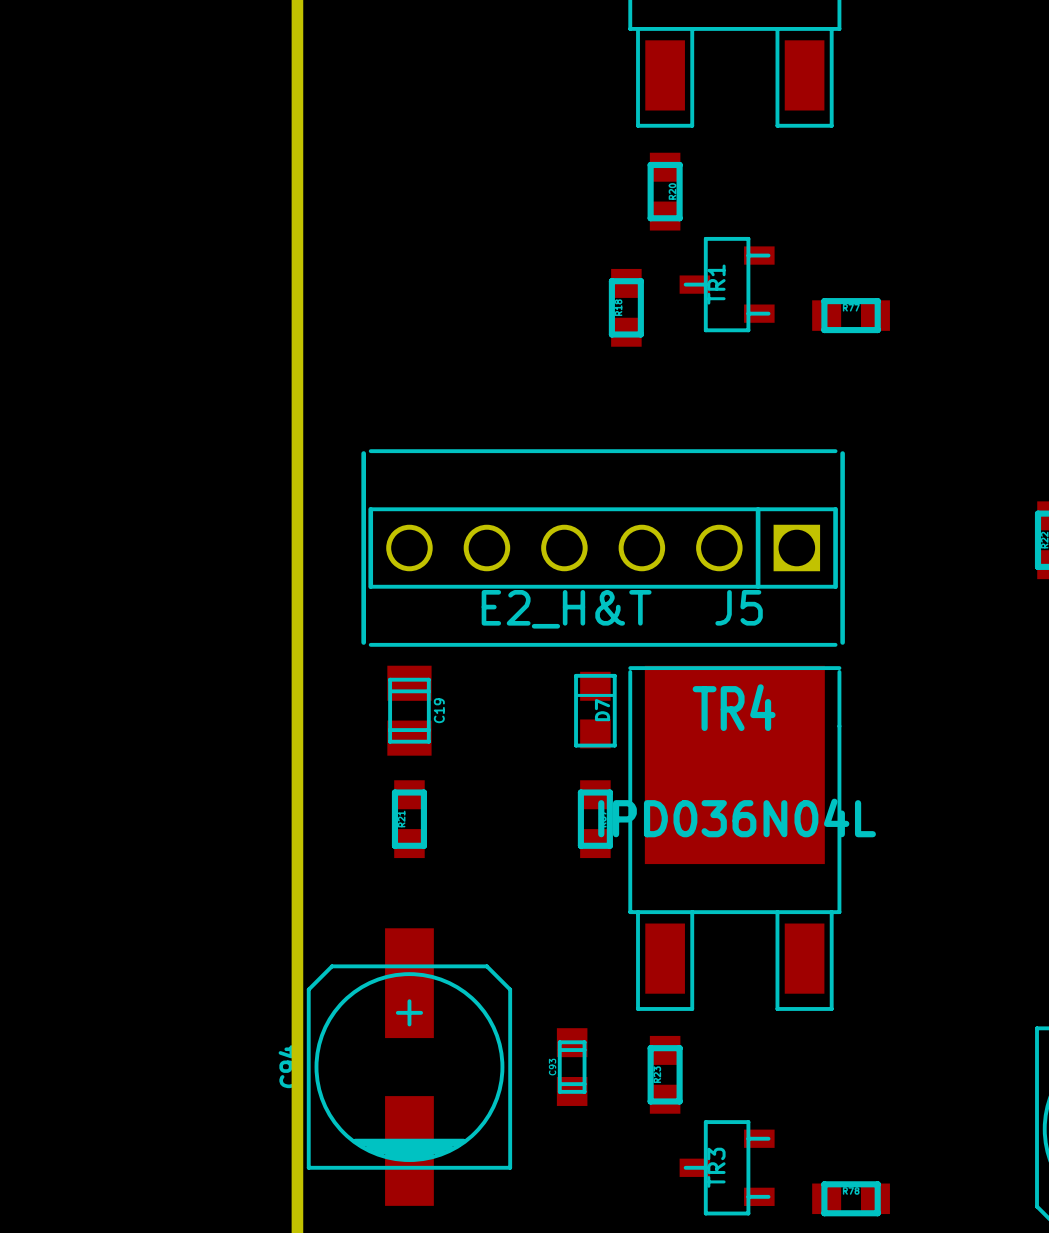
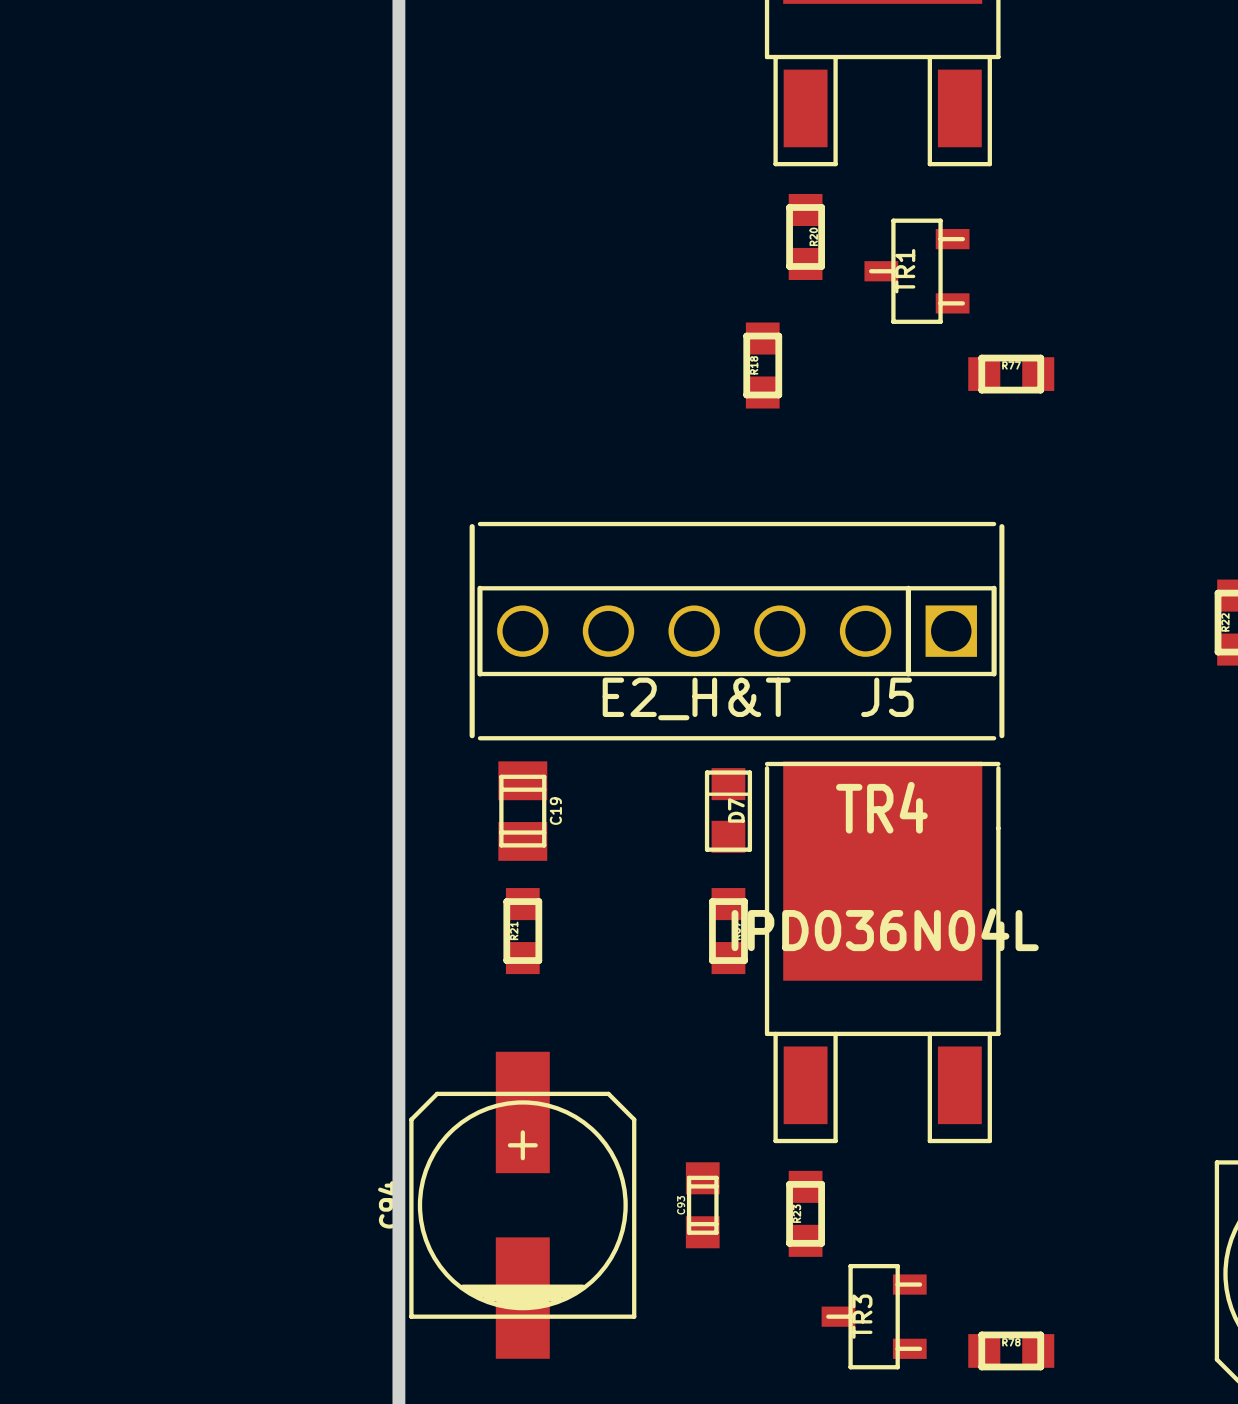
TR1 position: (727, 284) -> (916, 271)

